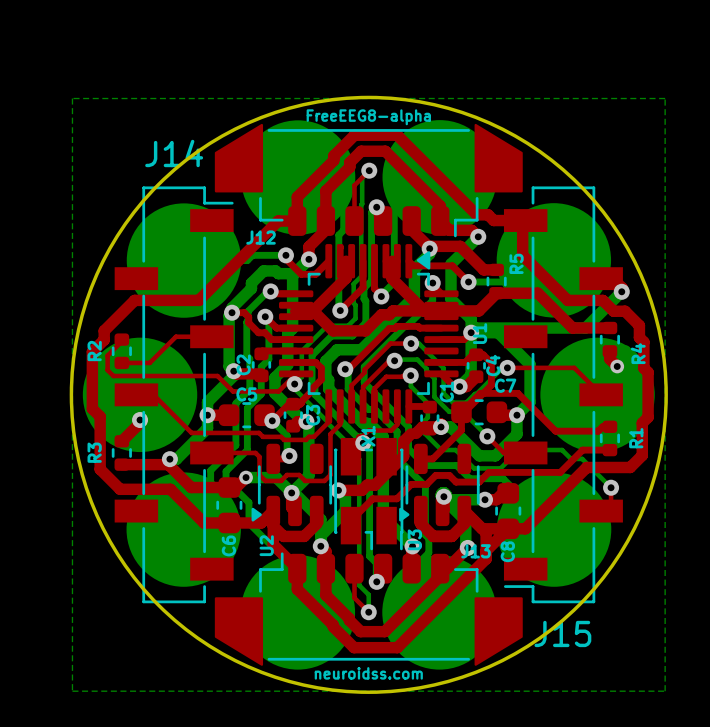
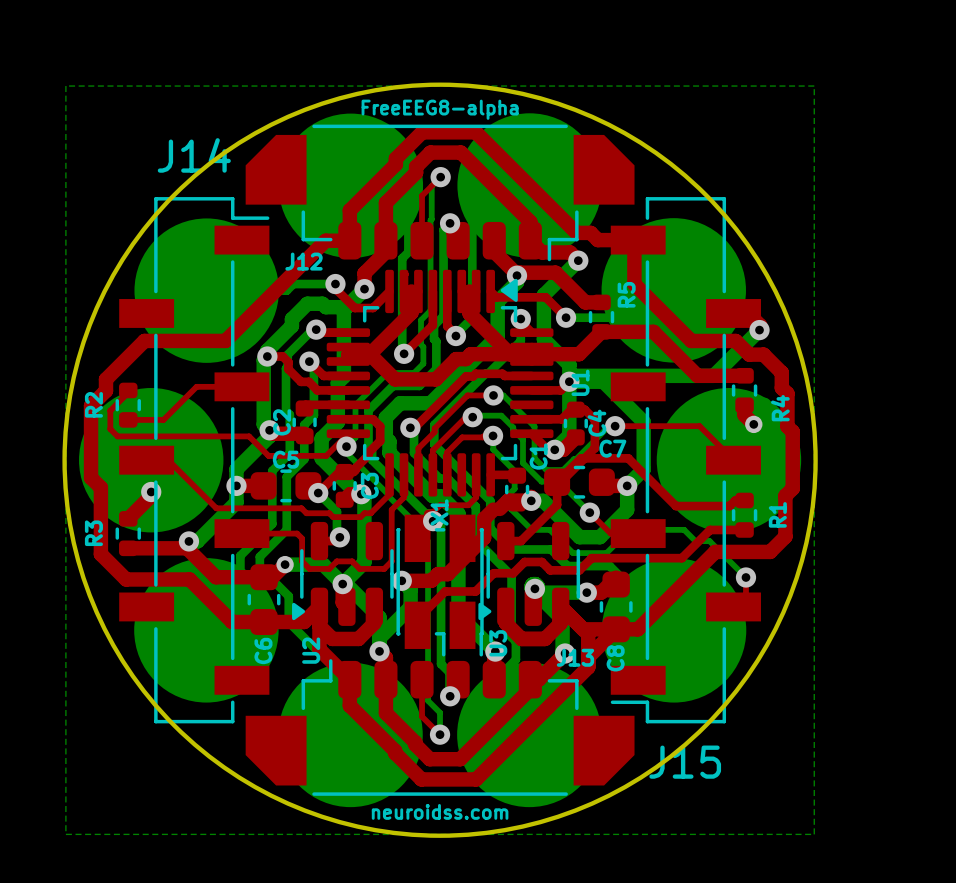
J12 footprint: [214, 123, 523, 238] -> [245, 124, 635, 262]
J13 footprint: [214, 552, 523, 666] -> [245, 659, 635, 796]

